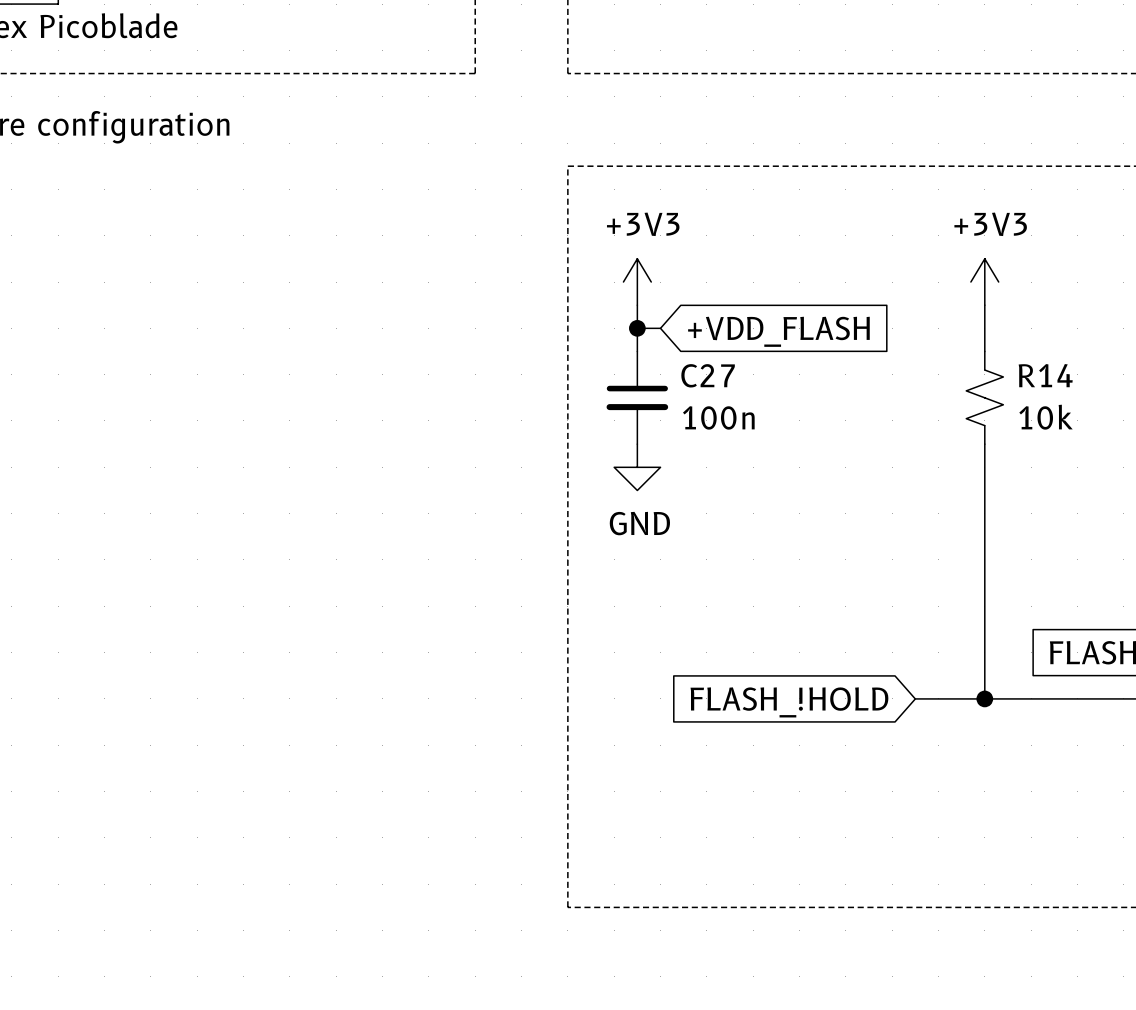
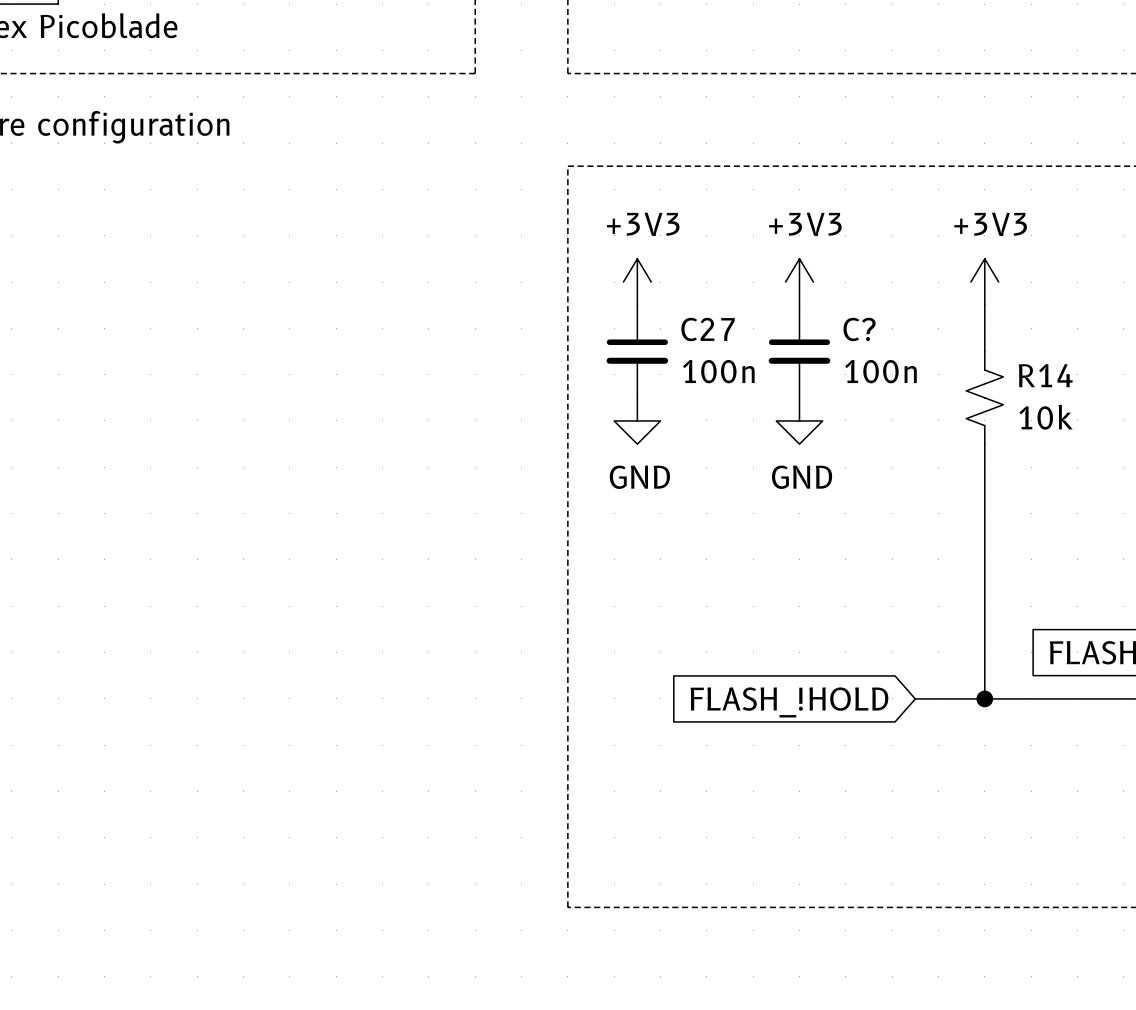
power symbol: none -> +3V3 (799, 282)
wire: (637, 328) (660, 328) -> none
junction: (637, 328) -> none
global label: +VDD_FLASH (778, 331) -> none
C?: none -> 100n (799, 351)
C27 position: (637, 397) -> (637, 351)
power symbol: none -> GND (799, 420)
power symbol position: GND (637, 467) -> GND (637, 420)

